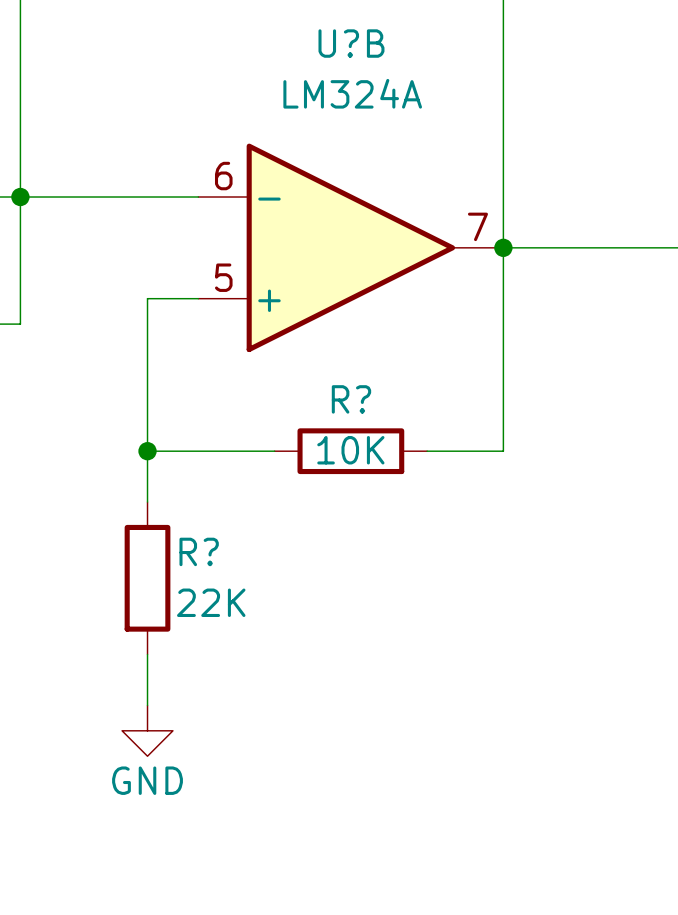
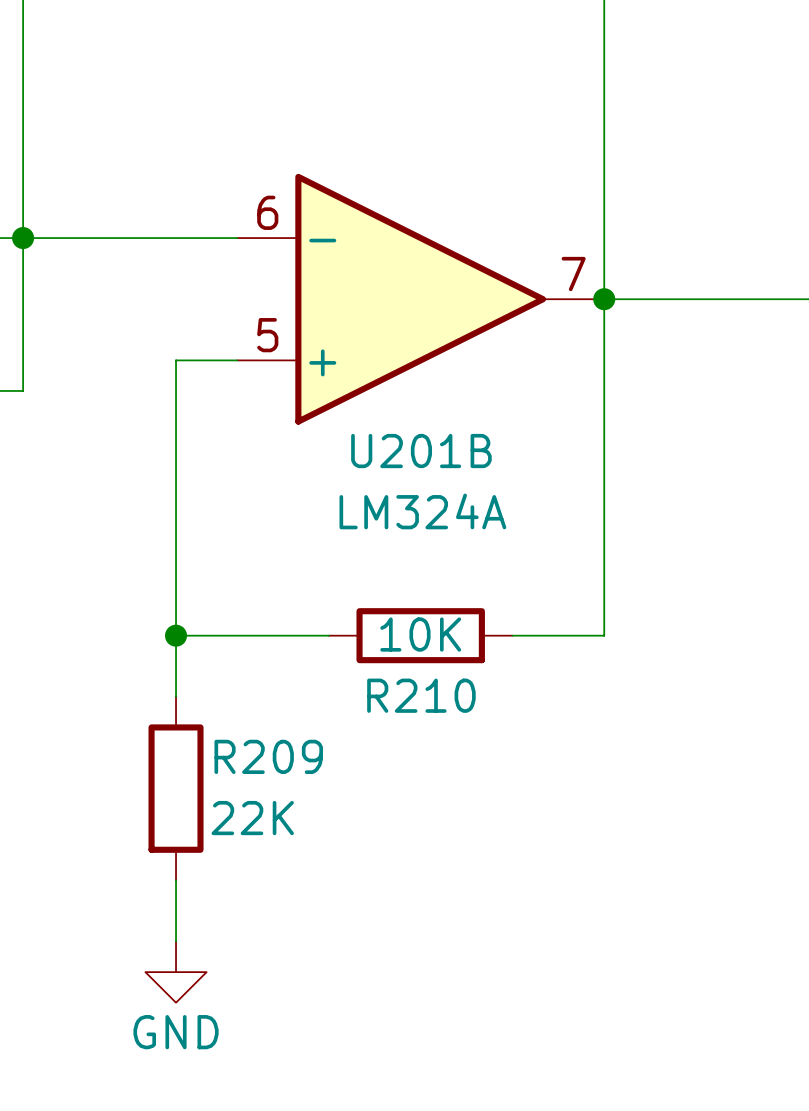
U?B name: U?B (351, 43) -> U201B (421, 451)
U?B value position: LM324A (352, 93) -> LM324A (422, 511)
wire: (147, 451) (274, 451) -> (176, 635) (328, 635)
junction position: (147, 451) -> (176, 635)
R?: 10K (350, 451) -> none
wire: (427, 451) (503, 451) -> (512, 635) (604, 635) (604, 543)
wire: none -> (176, 605) (176, 696)
R210: none -> 10K (420, 635)
R?: 22K (147, 578) -> none
wire: (147, 654) (147, 705) -> (176, 880) (176, 941)
R209: none -> 22K (176, 788)
power symbol position: GND (147, 730) -> GND (176, 972)

